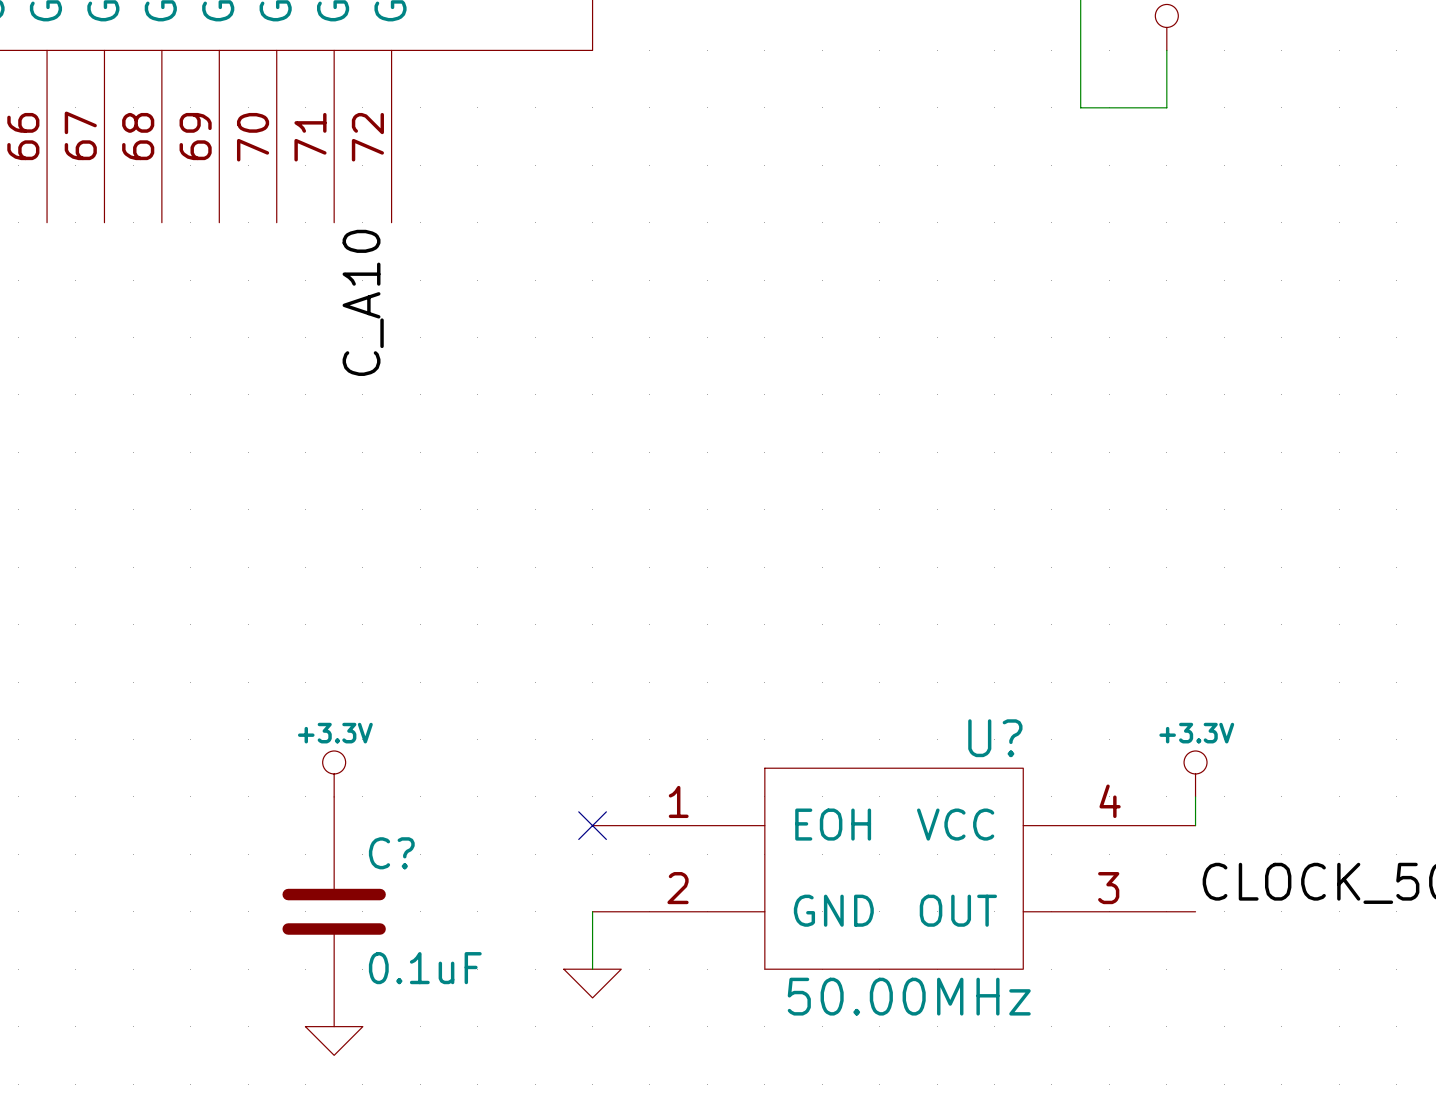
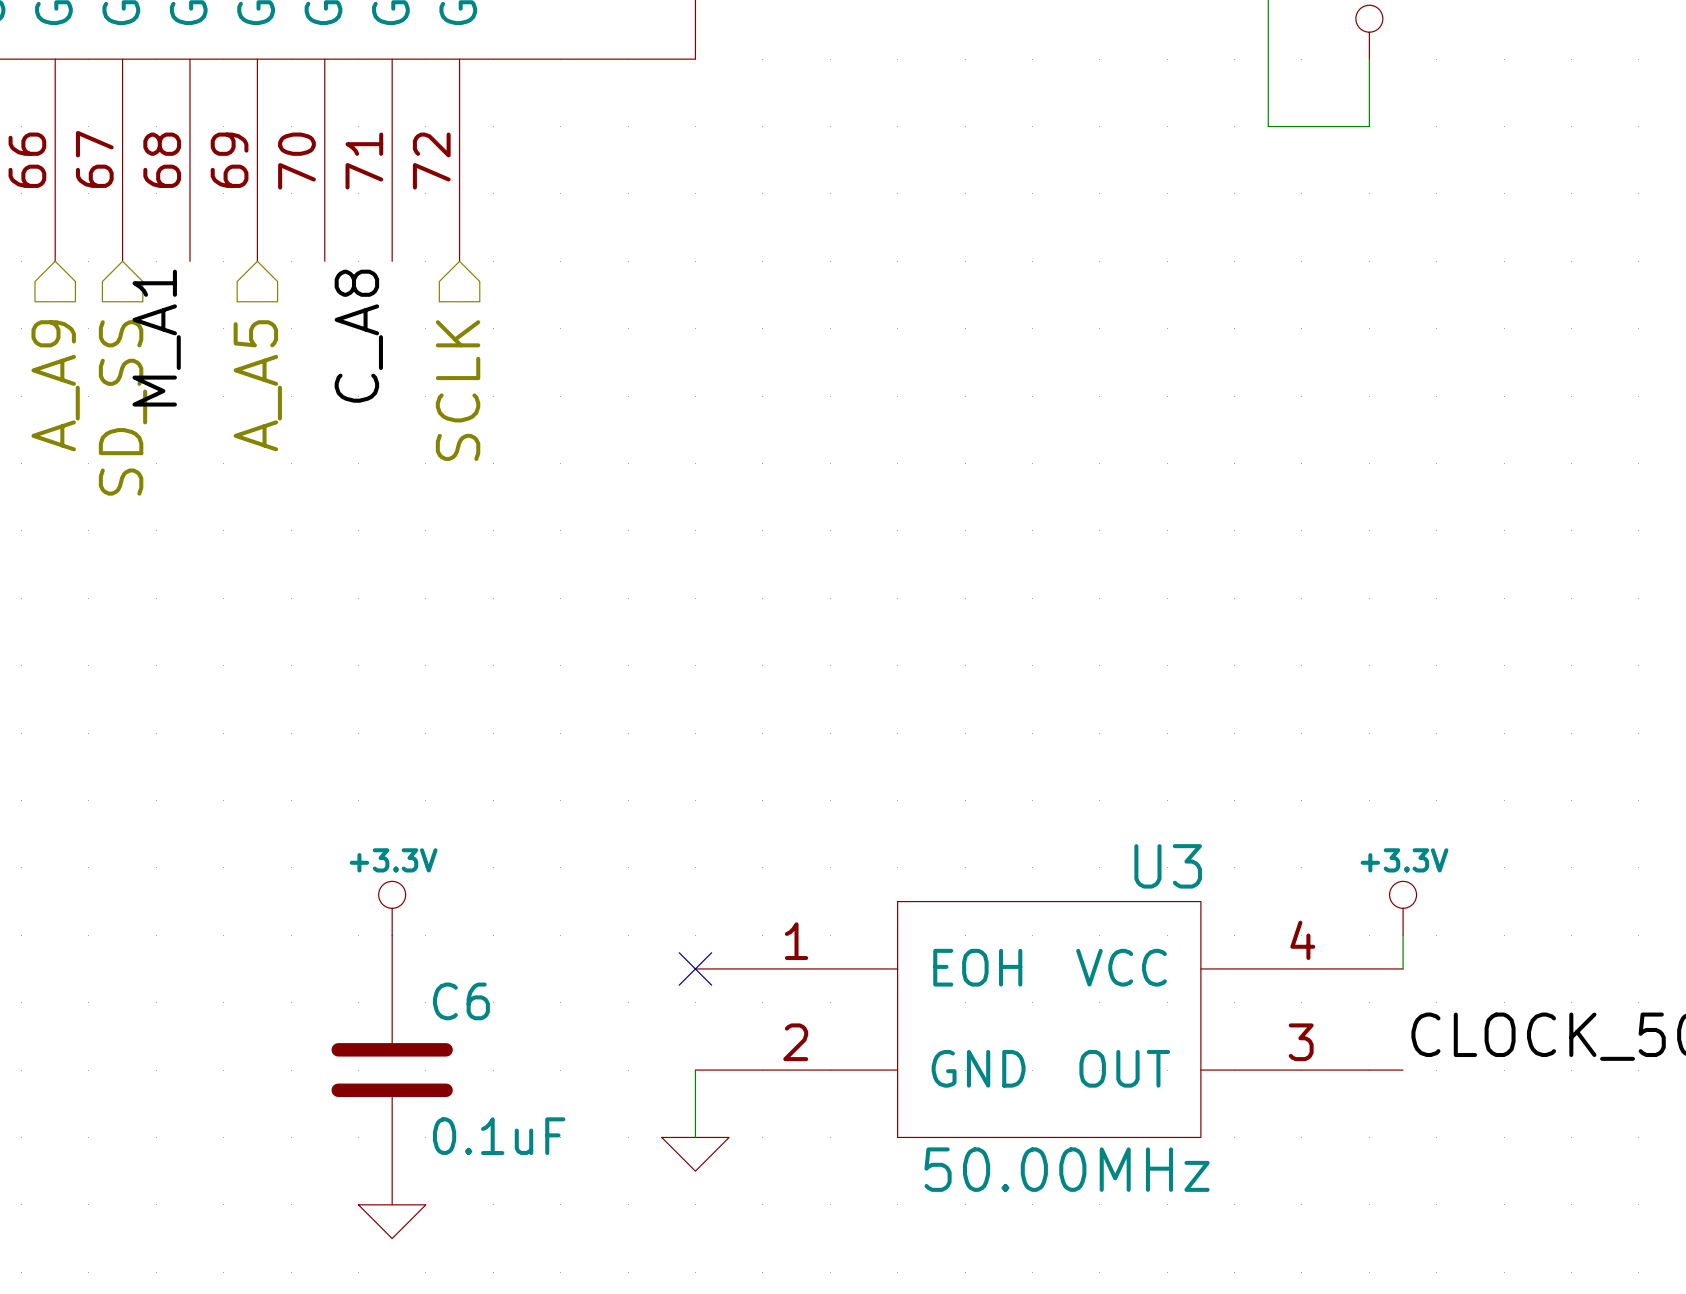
label: none -> M_A1 (156, 338)
label: C_A10 (363, 302) -> C_A8 (358, 336)
hierarchical label: none -> A_A9 (55, 385)
hierarchical label: none -> A_A5 (257, 385)
hierarchical label: none -> SCLK (458, 390)
hierarchical label: none -> SD_SS (123, 407)
U? name: U? (995, 738) -> U3 (1168, 866)
C? name: C? (391, 853) -> C6 (461, 1001)

